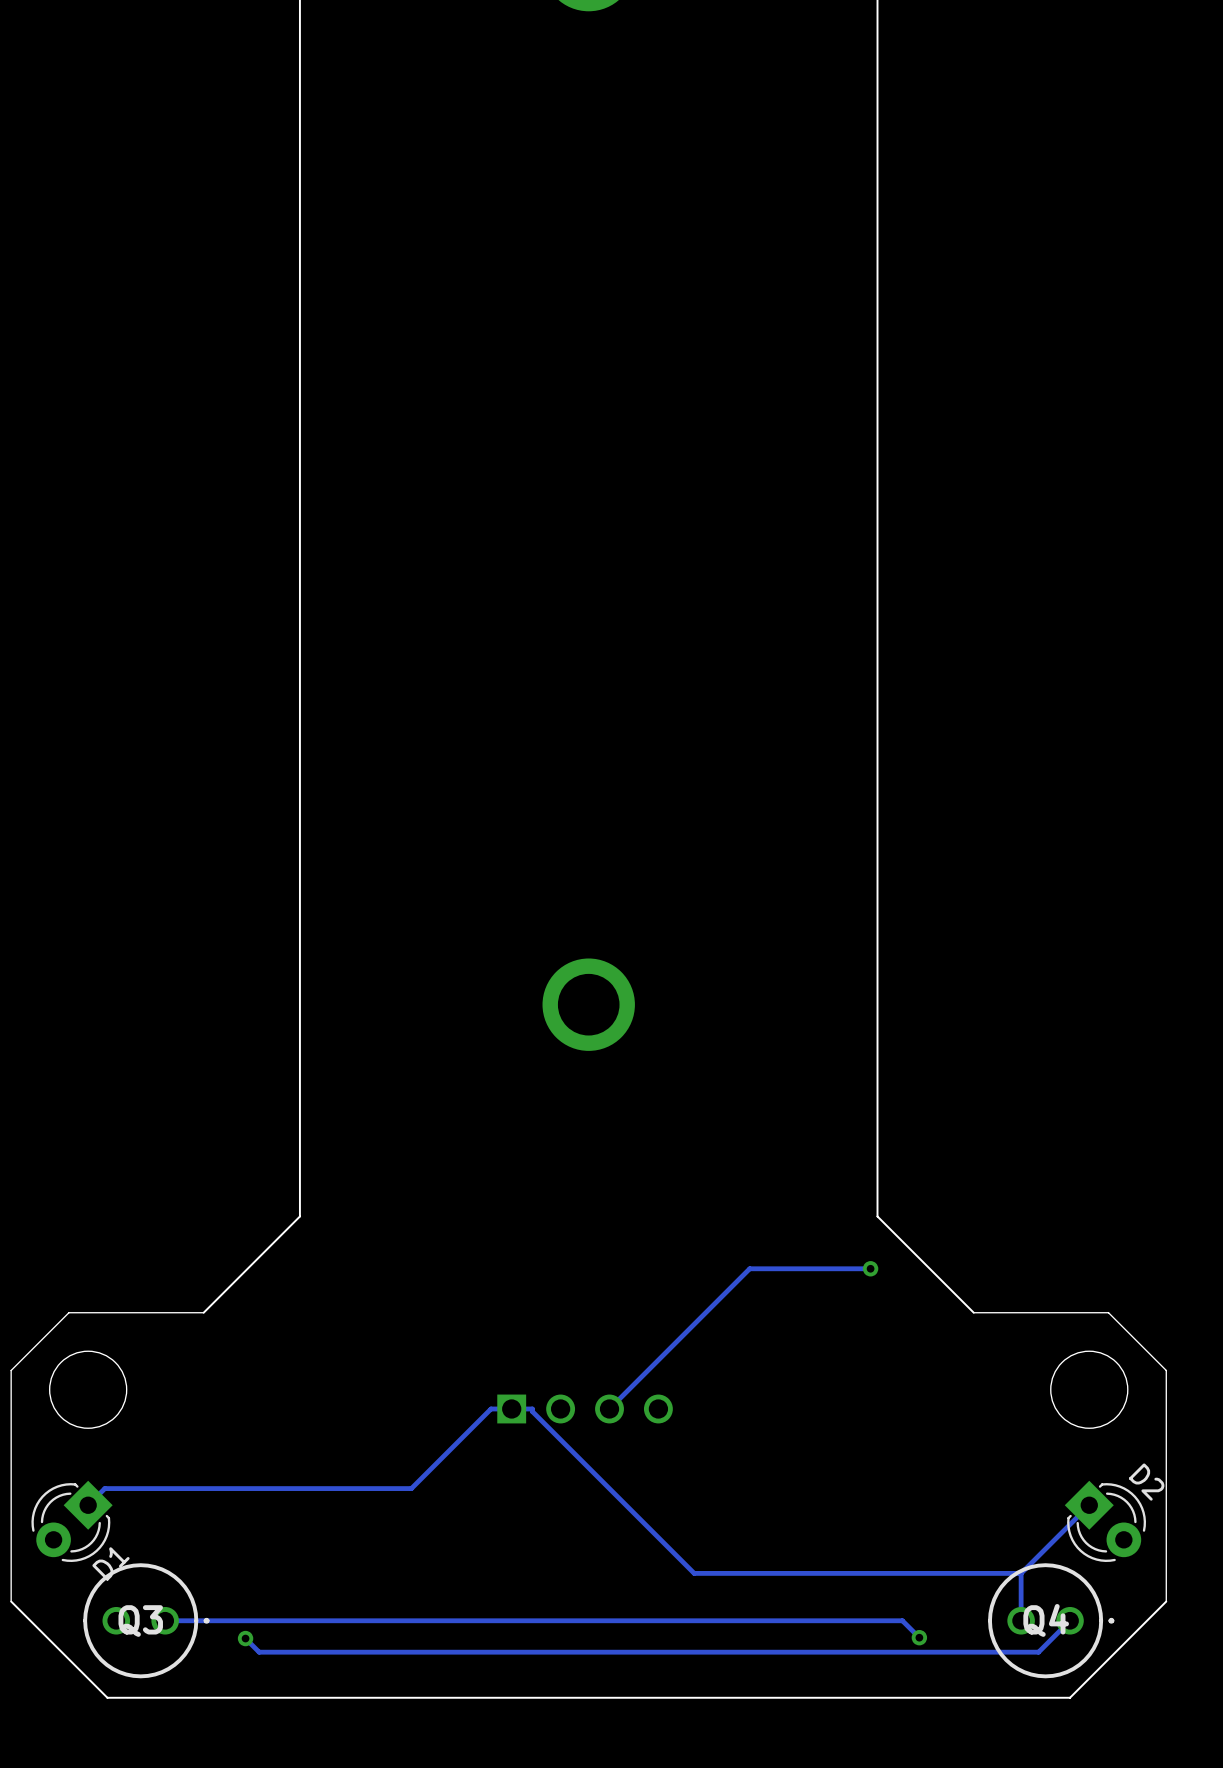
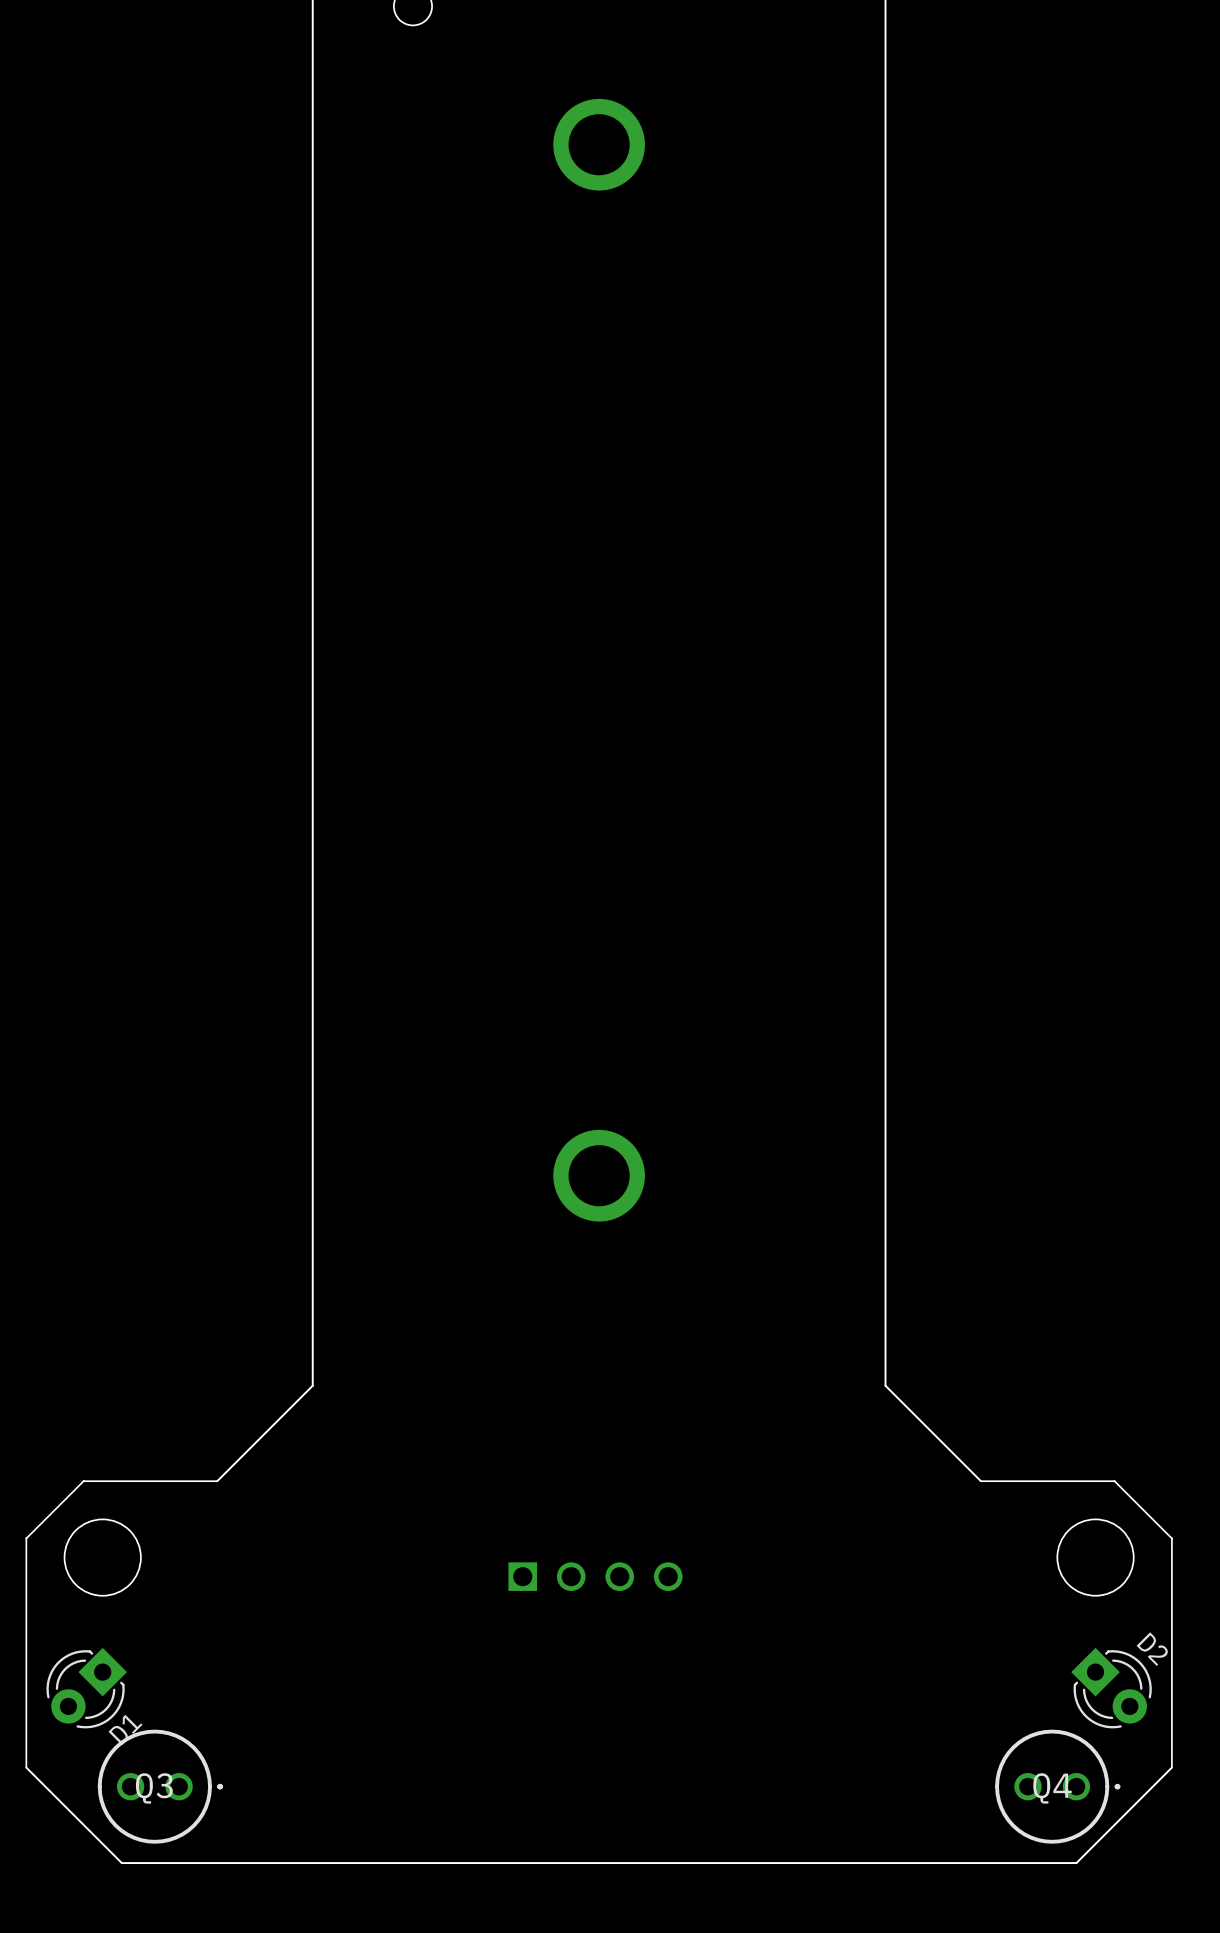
track: (870, 1268) (749, 1268) (609, 1408) -> none
via: (870, 1268) -> none
track: (88, 1505) (104, 1488) (411, 1488) (491, 1408) (532, 1408) (532, 1411) (694, 1573) (1021, 1573) -> none
track: (1089, 1505) (1021, 1573) -> none
track: (1021, 1573) (1021, 1620) -> none
track: (165, 1620) (902, 1620) (919, 1637) -> none
track: (1070, 1620) (1038, 1652) (259, 1652) (245, 1638) -> none
via: (919, 1637) -> none
via: (245, 1638) -> none

